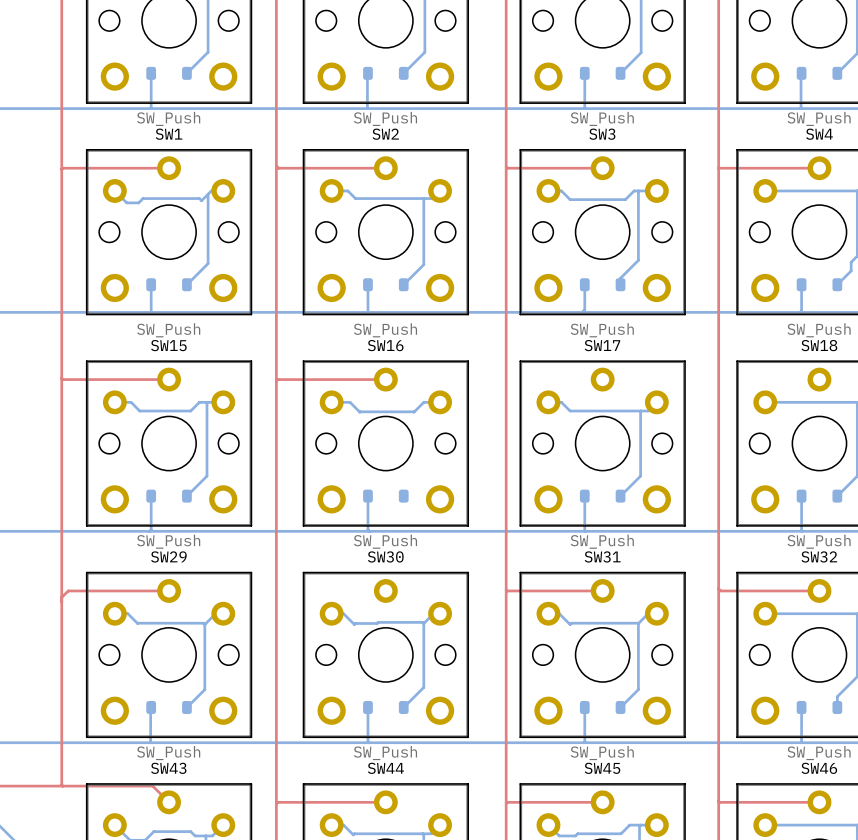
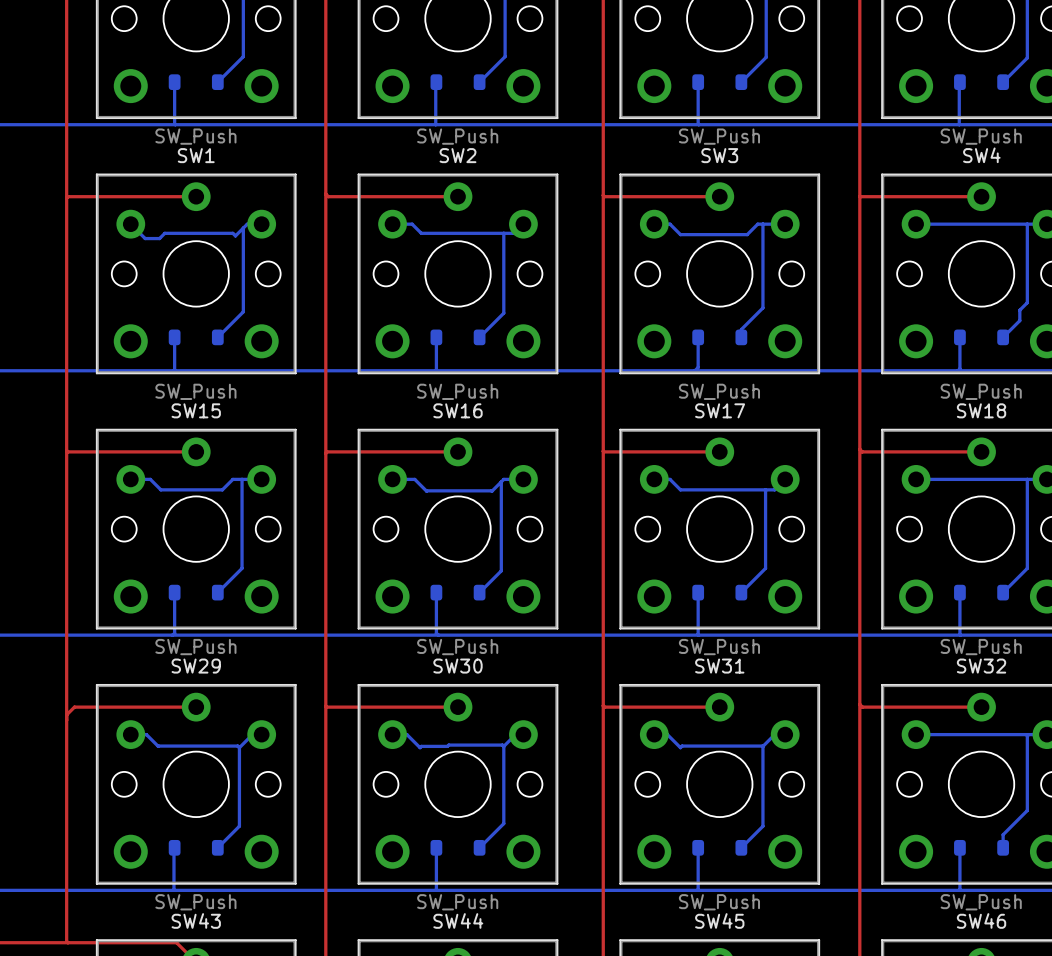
top track: none -> (859, 449) (862, 451) (981, 451)
top track: none -> (603, 451) (719, 451)
bottom track: none -> (501, 481) (501, 570) (479, 592)
top track: none -> (325, 706) (457, 707)

